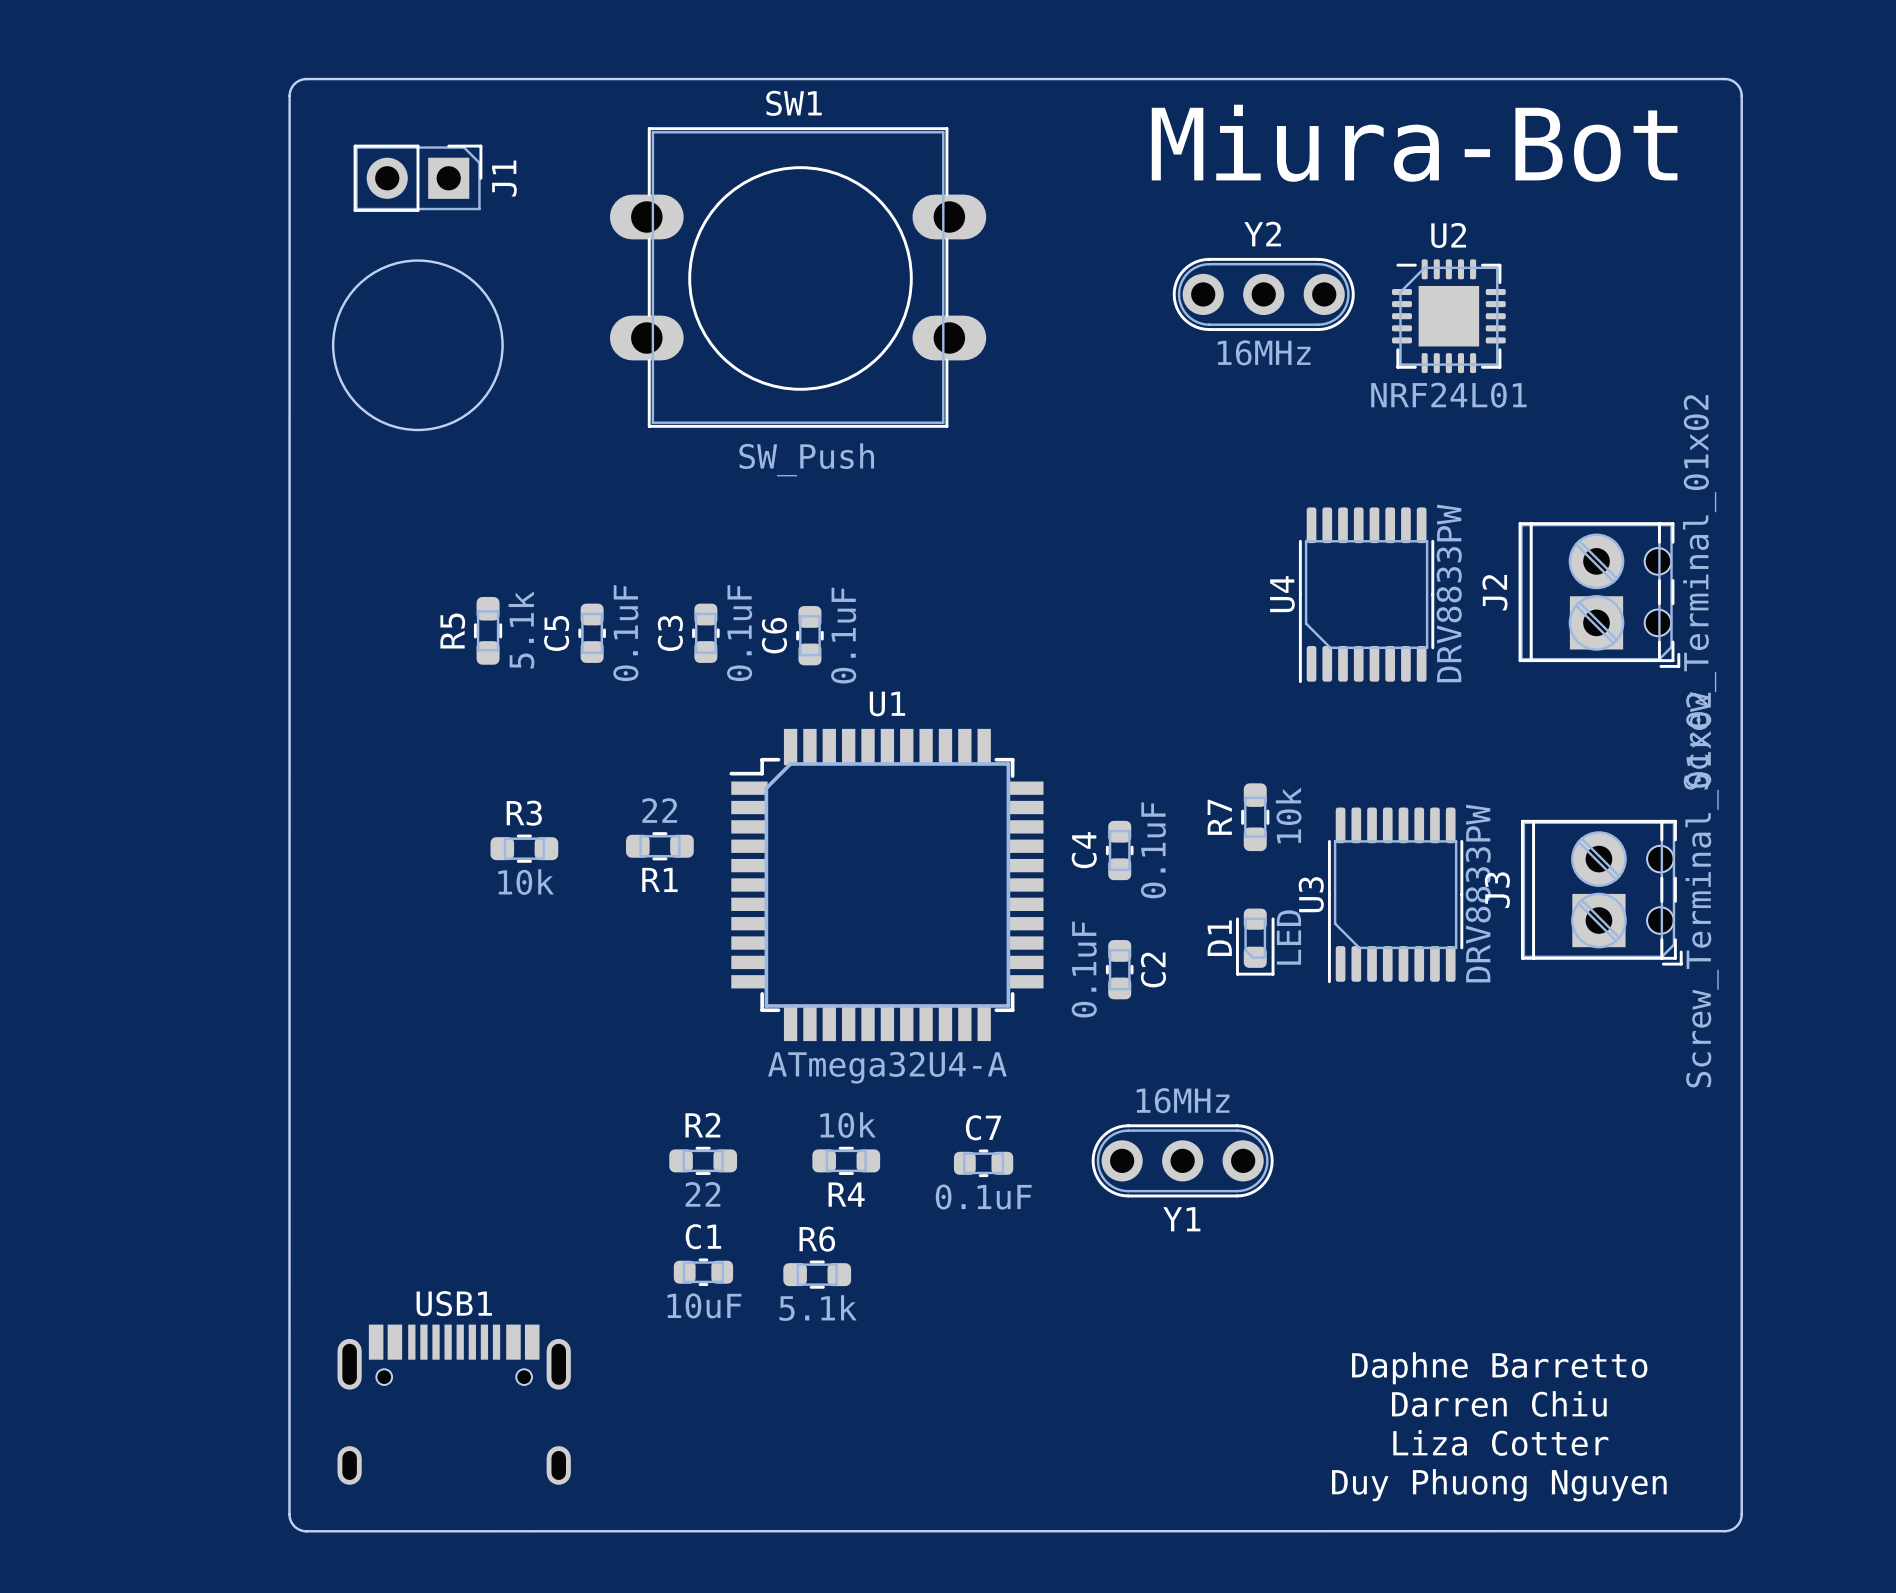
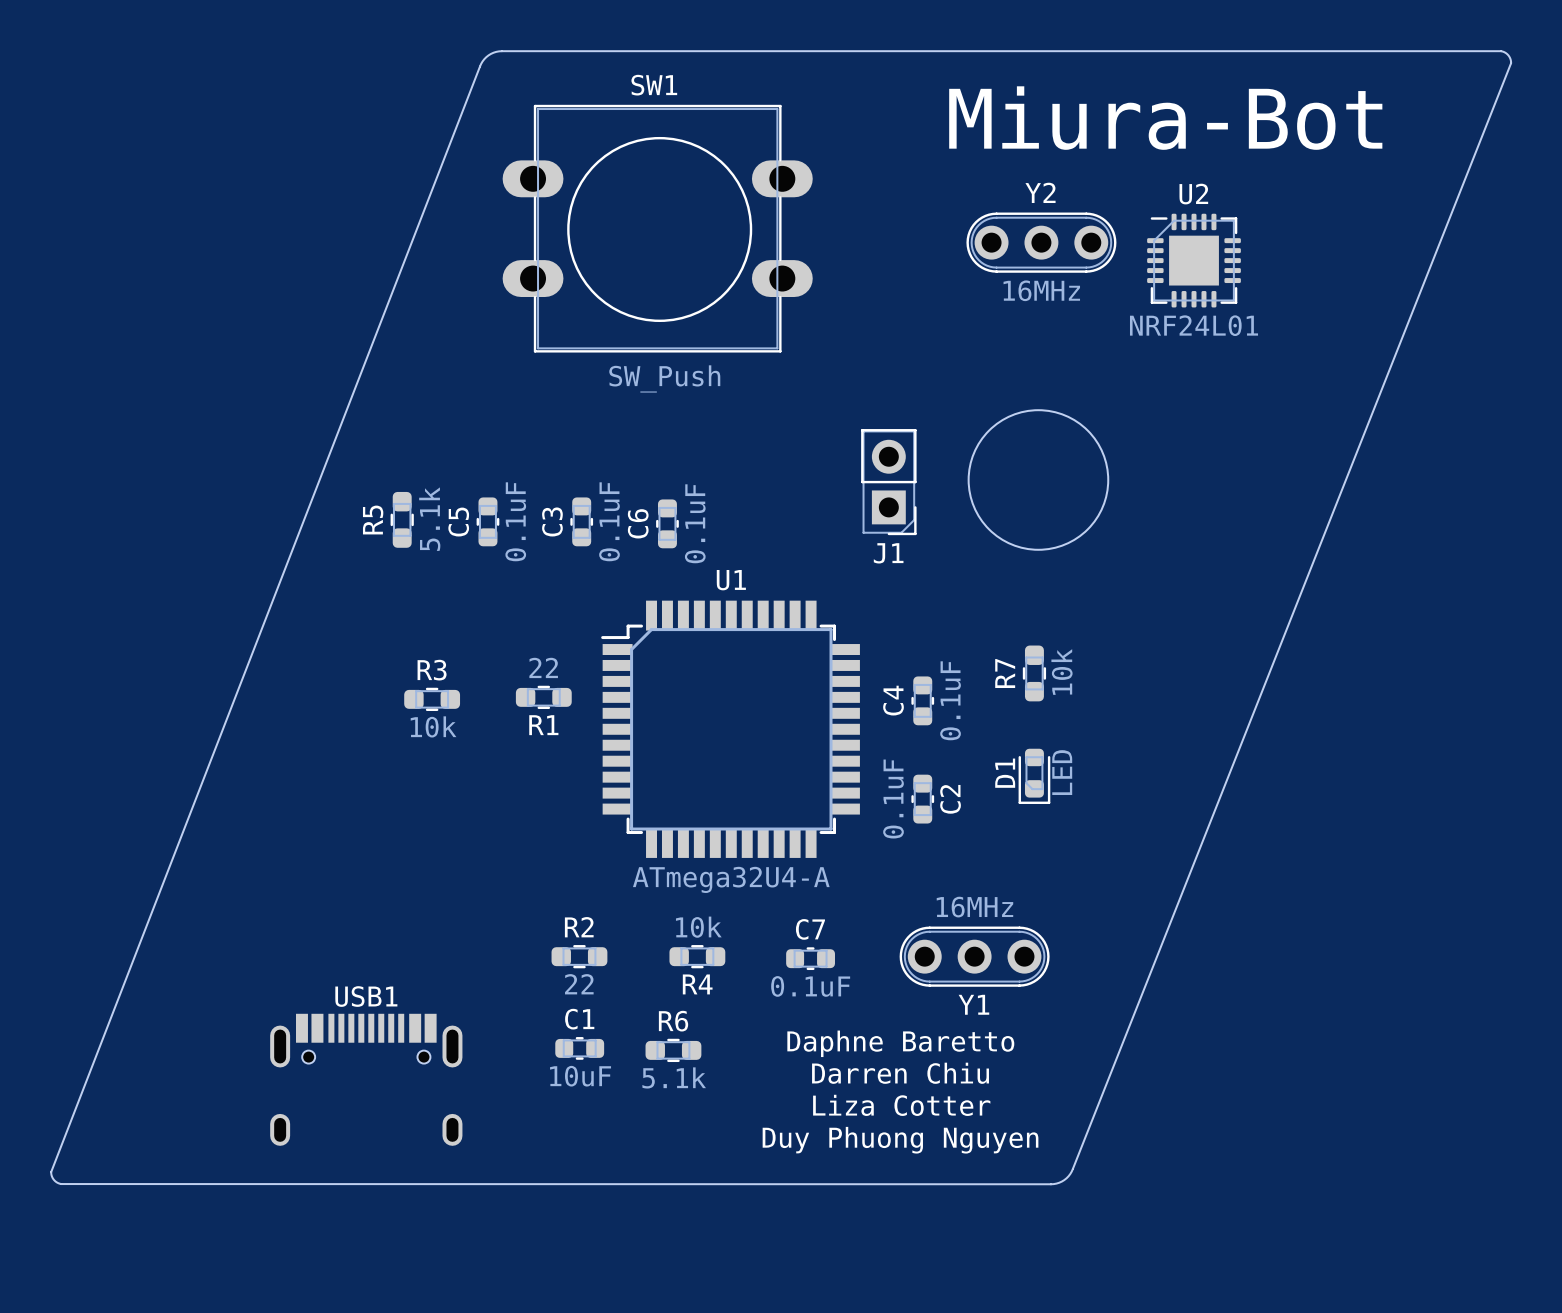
board edge: (306, 79) (1724, 79) (1736, 84) (1741, 95) (1741, 1514) (1736, 1526) (1724, 1531) (306, 1531) (294, 1526) (289, 1514) (289, 95) (294, 84) (306, 79) -> (501, 51) (488, 55) (479, 66) (51, 1172) (52, 1177) (61, 1184) (1050, 1184) (1061, 1181) (1068, 1176) (1072, 1168) (1511, 63) (1509, 57) (1501, 51) (501, 51)
J1 rotation: 0° (417, 178) -> 90° clockwise (888, 482)
J1 position: (417, 178) -> (888, 482)
round board edge: [331, 259, 504, 432] -> none
round board edge: none -> [967, 409, 1110, 551]
U4: DRV8833PW (1366, 595) -> none
J2: Screw_Terminal_01x02 (1599, 595) -> none
J3: Screw_Terminal_01x02 (1601, 892) -> none
U3: DRV8833PW (1395, 895) -> none
text: none -> Daphne Baretto (900, 1043)
text: Daphne Barretto (1499, 1368) -> none
USB1 position: (454, 1404) -> (366, 1079)
text position: Darren Chiu (1499, 1404) -> Darren Chiu (900, 1073)
text position: Liza Cotter (1500, 1442) -> Liza Cotter (901, 1105)
text position: Duy Phuong Nguyen (1499, 1485) -> Duy Phuong Nguyen (900, 1140)

